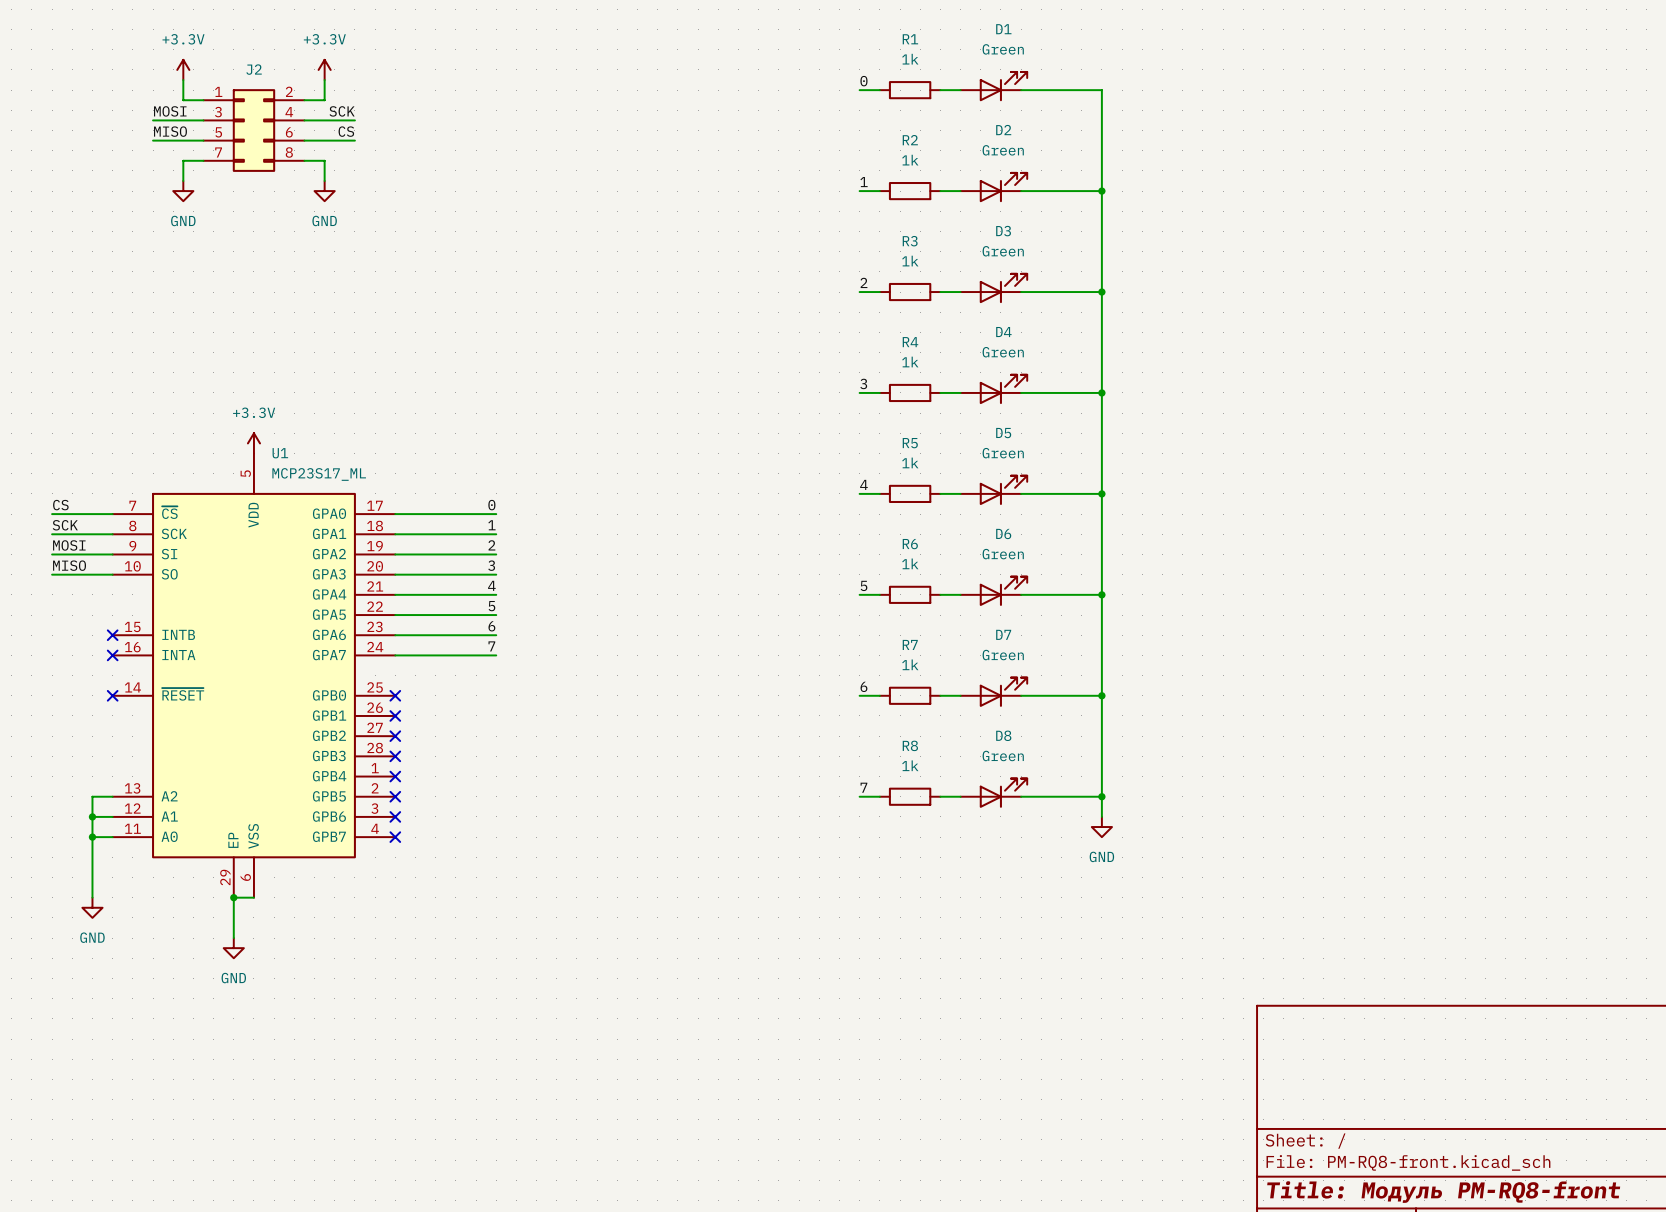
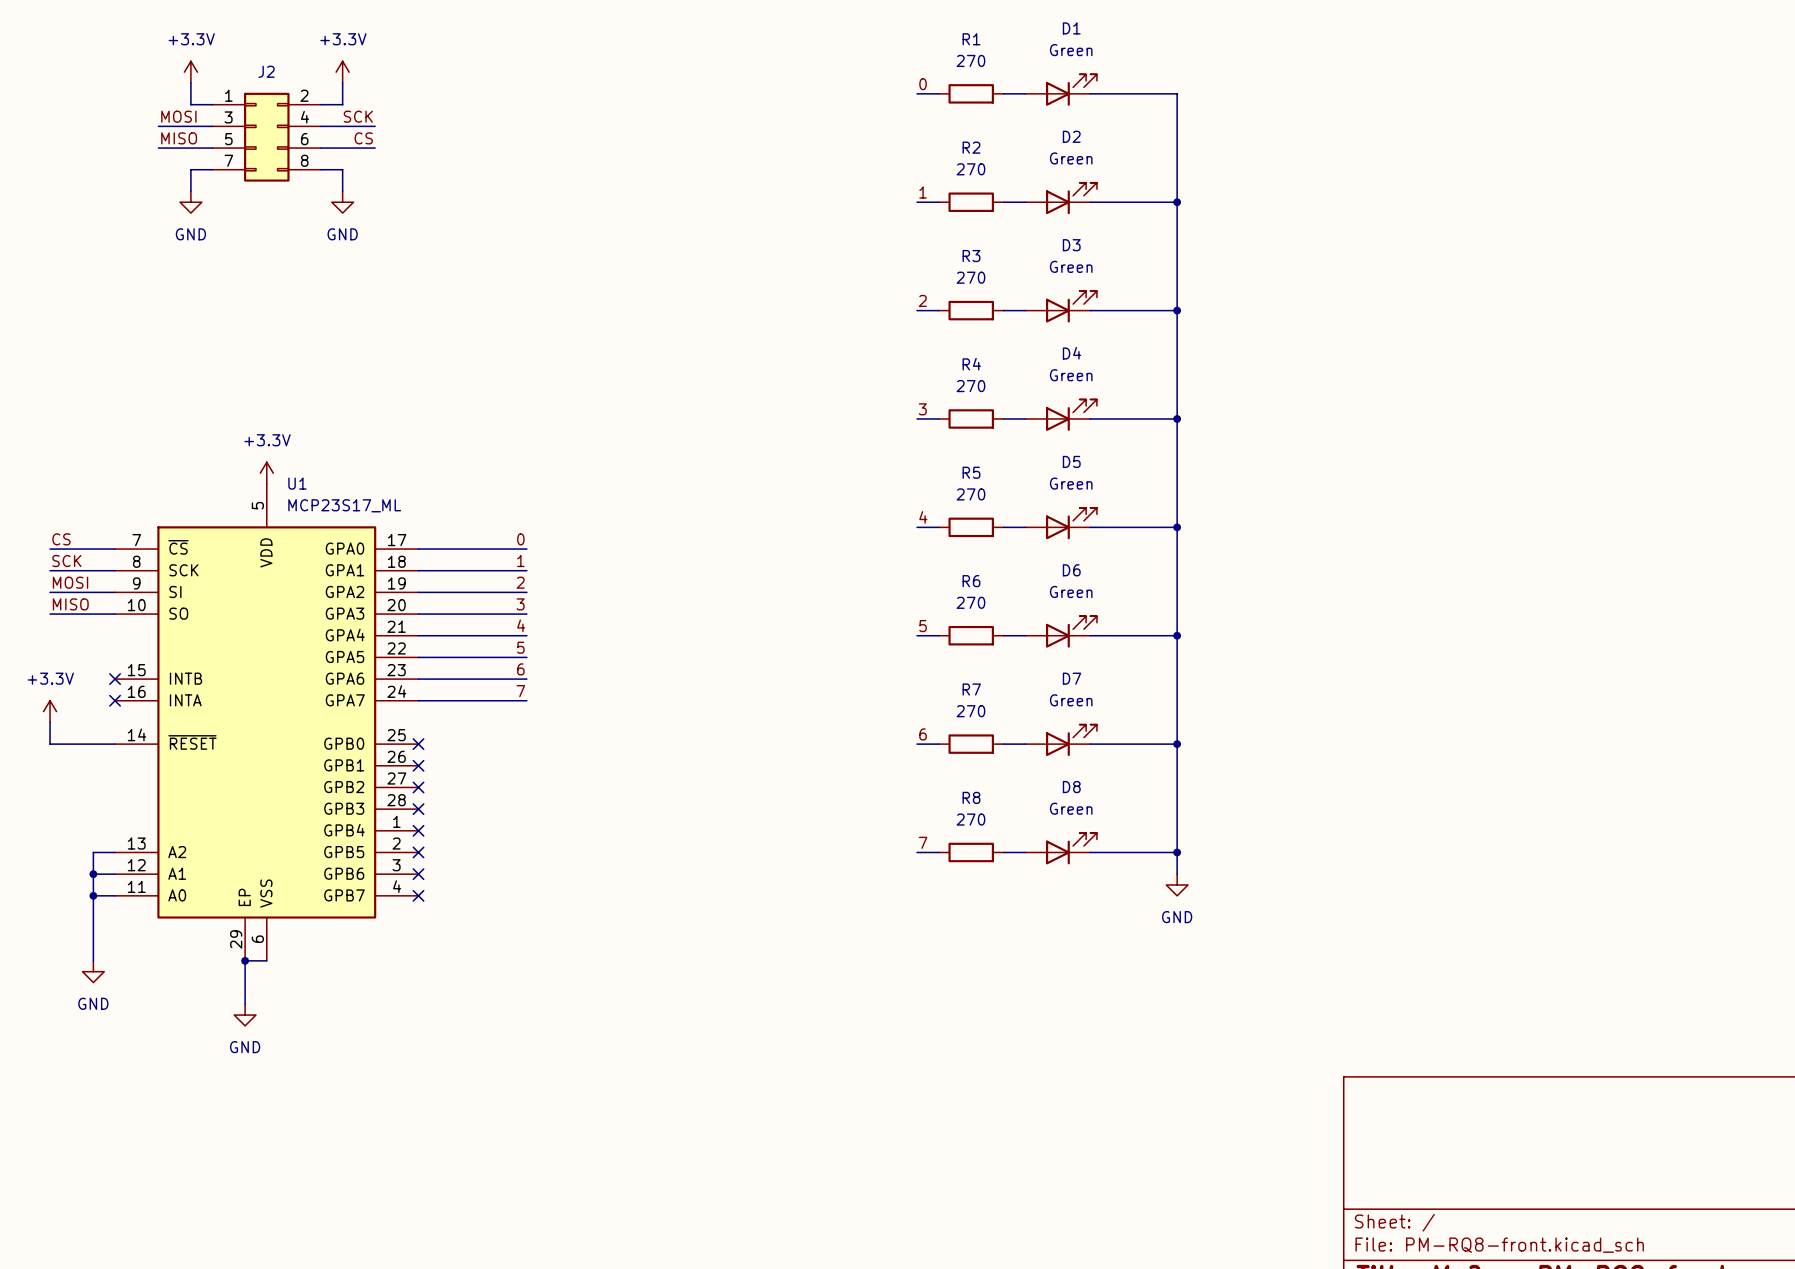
R1 value: 1k (910, 59) -> 270 (970, 60)
R2 value: 1k (910, 160) -> 270 (970, 169)
R3 value: 1k (910, 261) -> 270 (970, 277)
R4 value: 1k (910, 362) -> 270 (970, 386)
R5 value: 1k (910, 462) -> 270 (970, 494)
R6 value: 1k (910, 563) -> 270 (970, 602)
R7 value: 1k (910, 664) -> 270 (970, 711)
power symbol: none -> +3.3V (50, 711)
wire: none -> (50, 722) (50, 744) (115, 744)
no-connect mark: (112, 695) -> none
R8 value: 1k (910, 765) -> 270 (970, 819)

